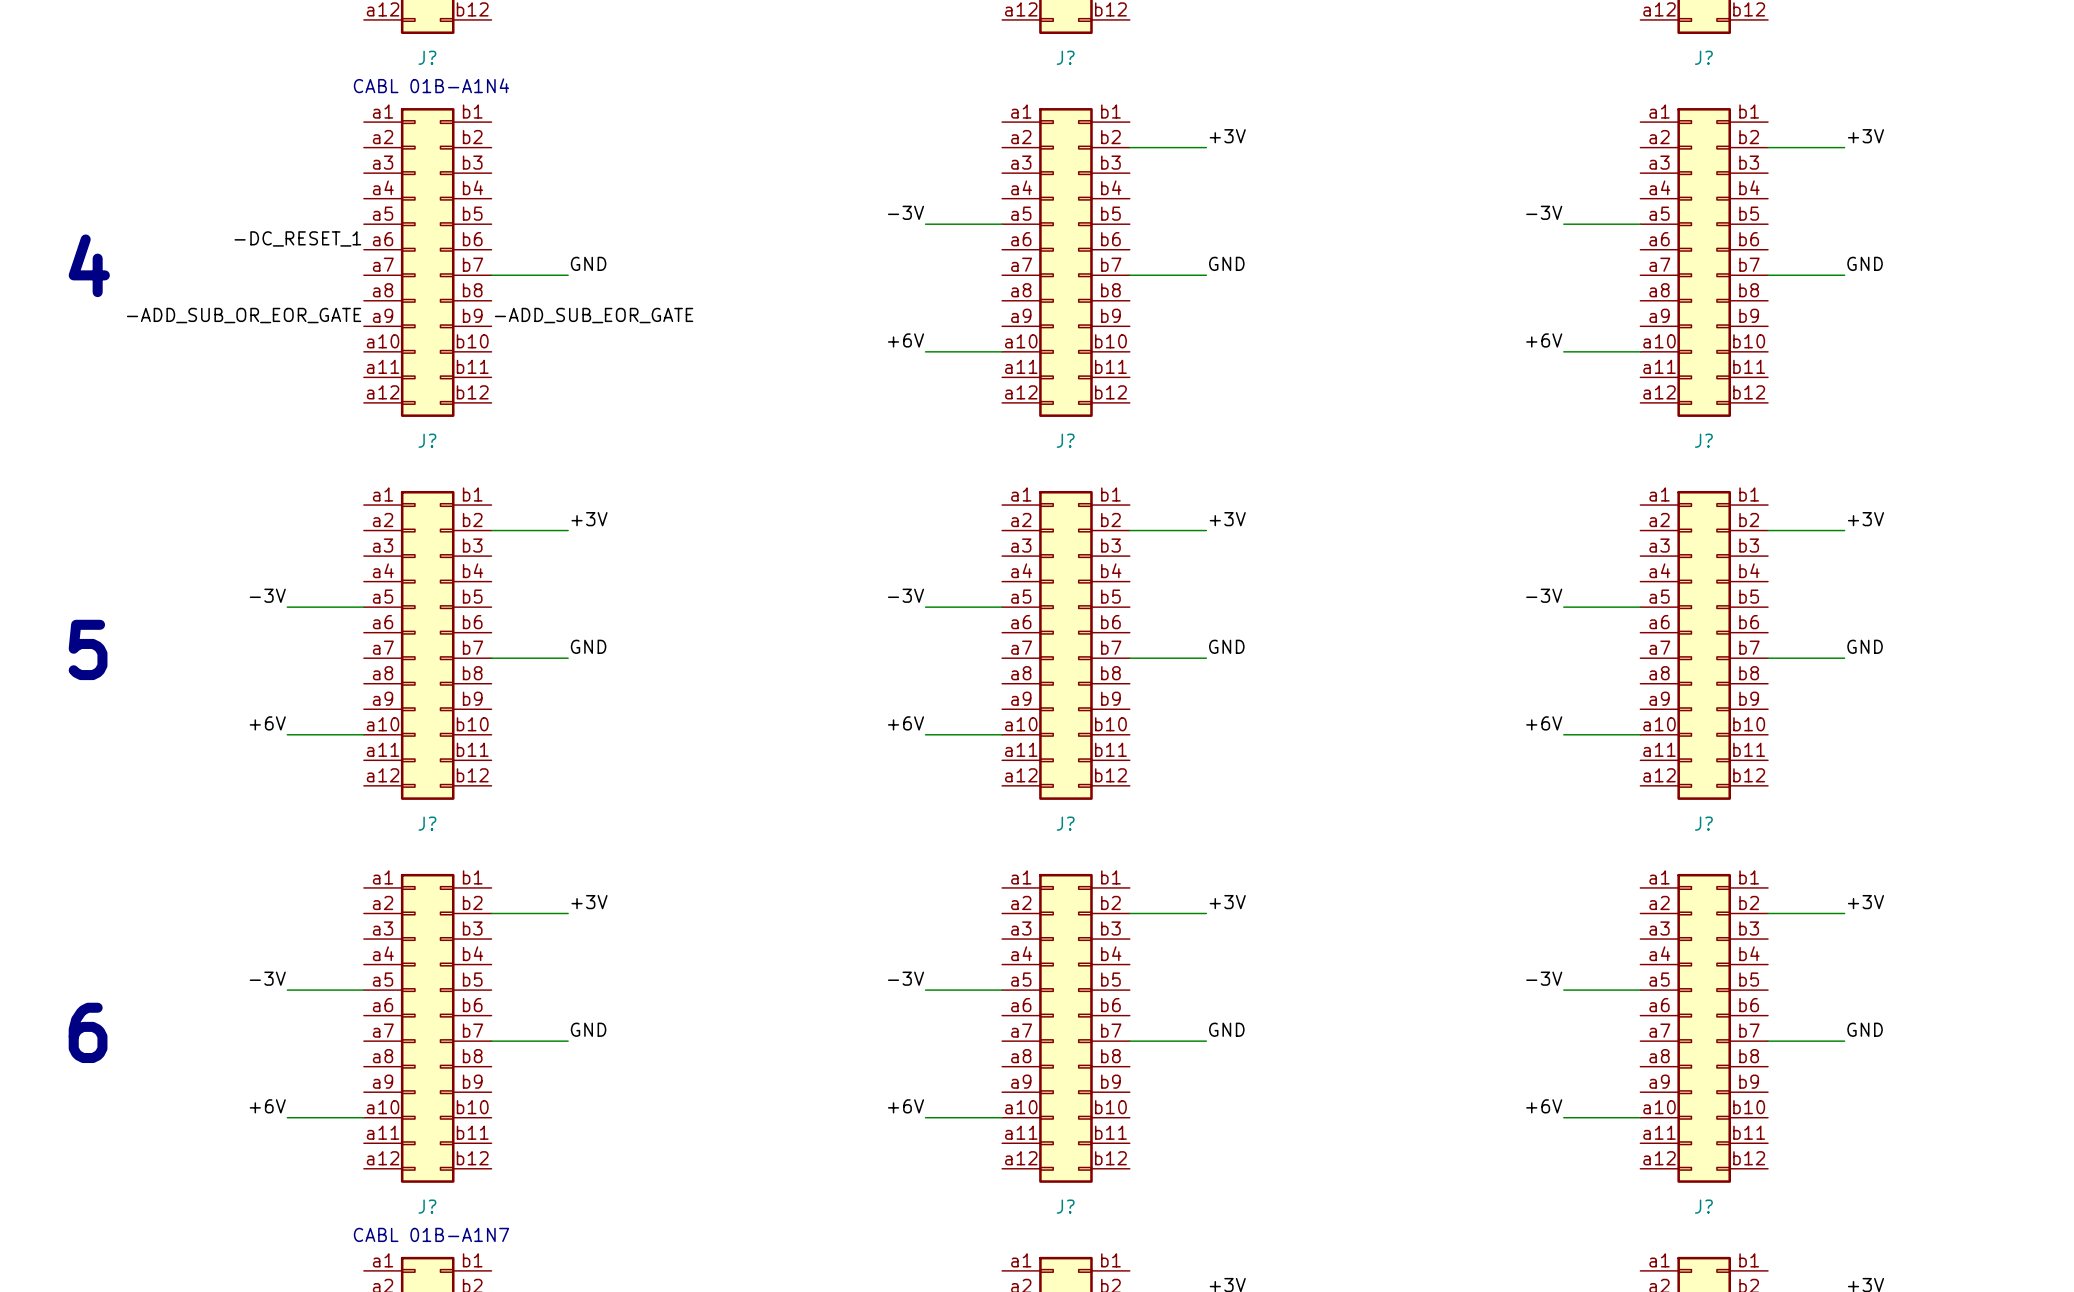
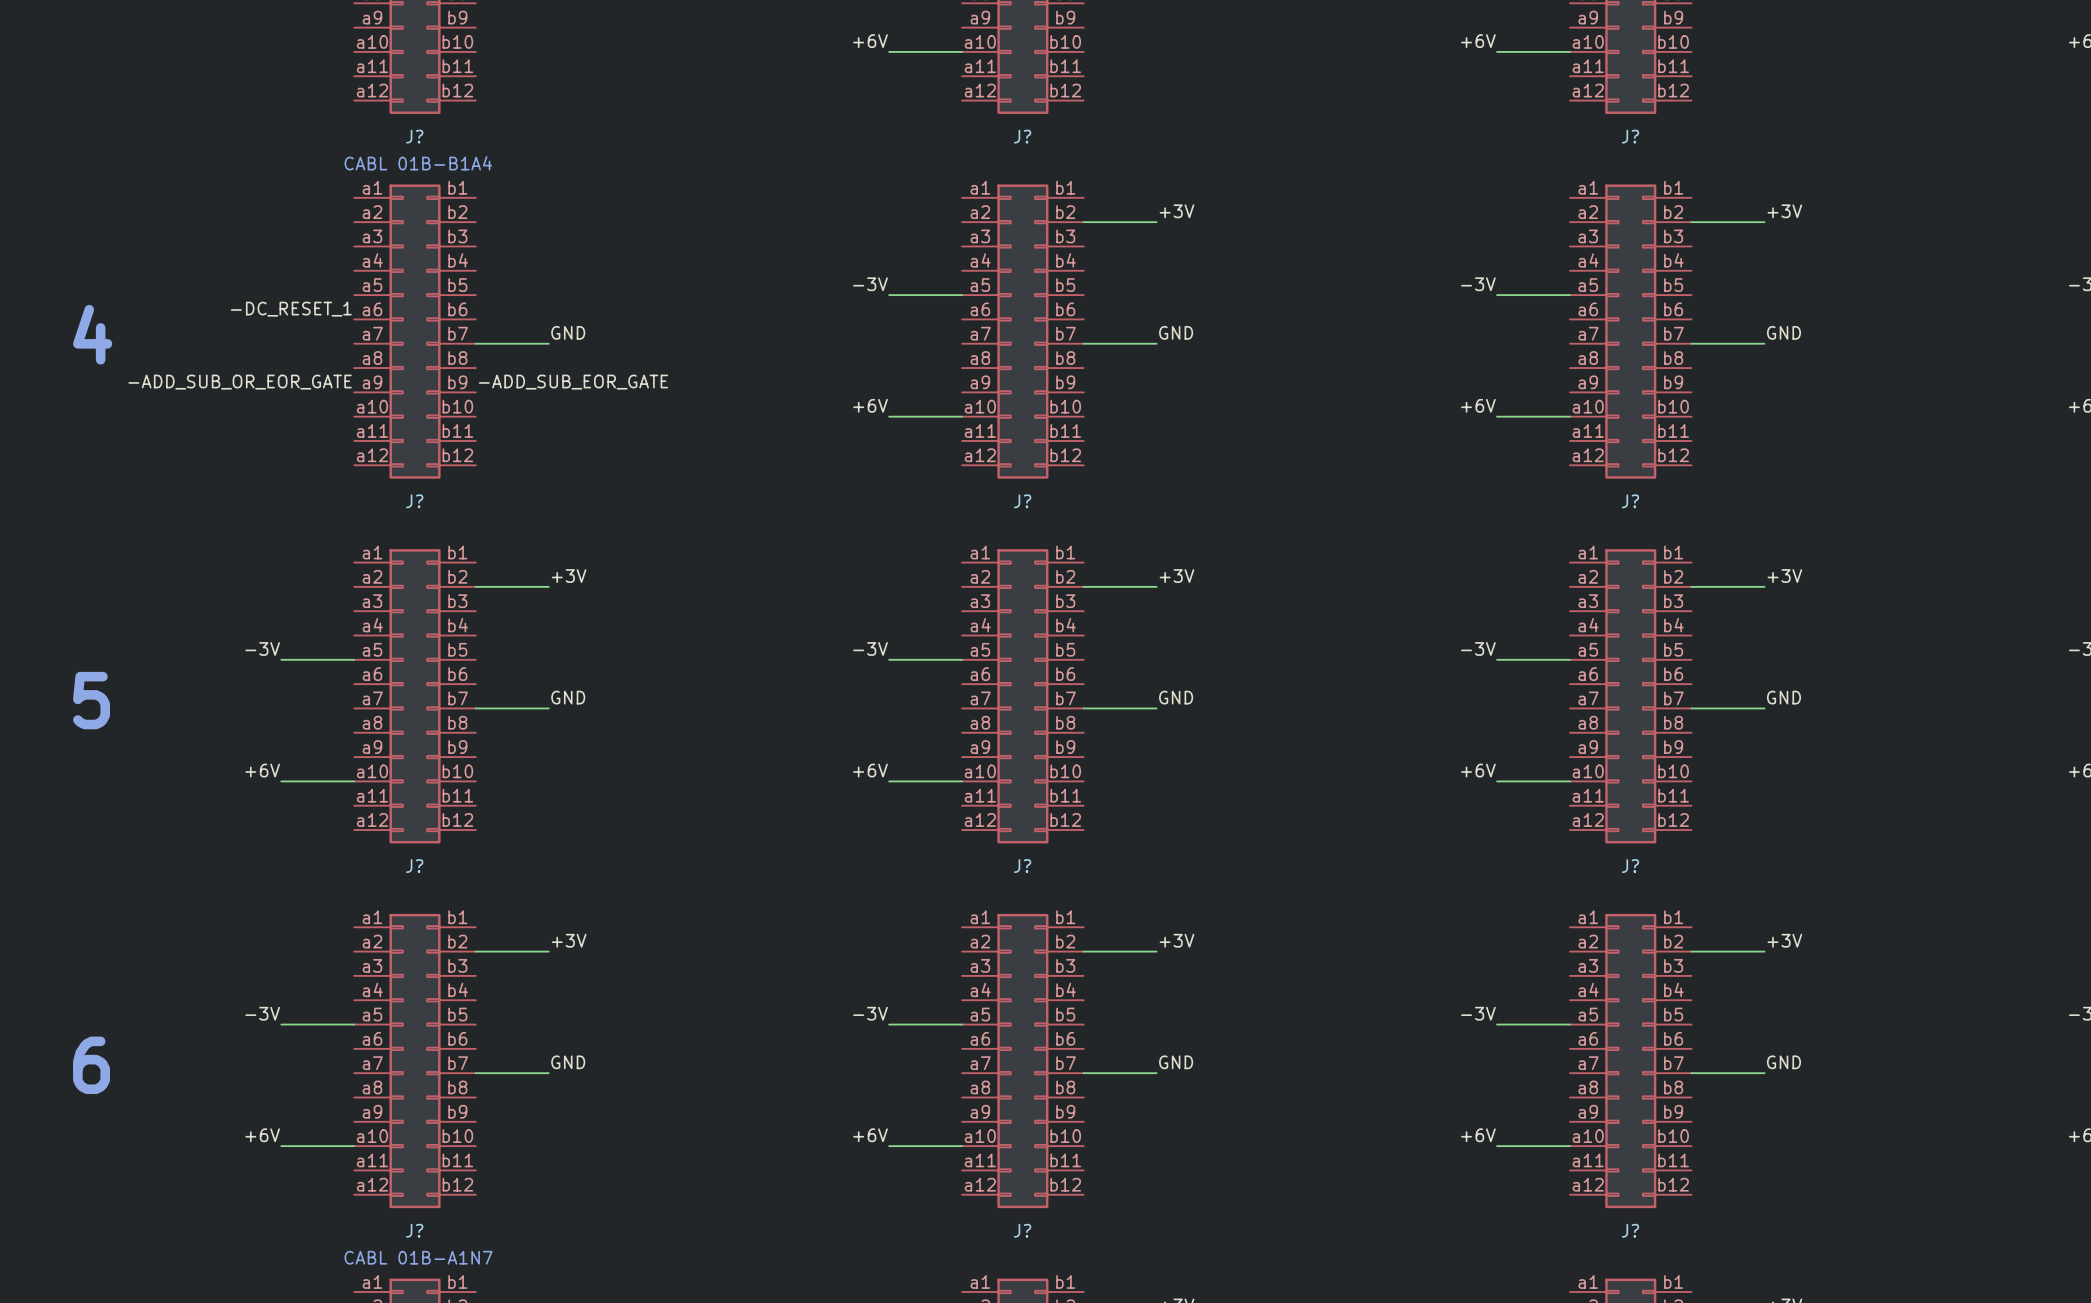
text: CABL 01B-A1N4 (431, 85) -> CABL 01B-B1A4 (418, 163)

